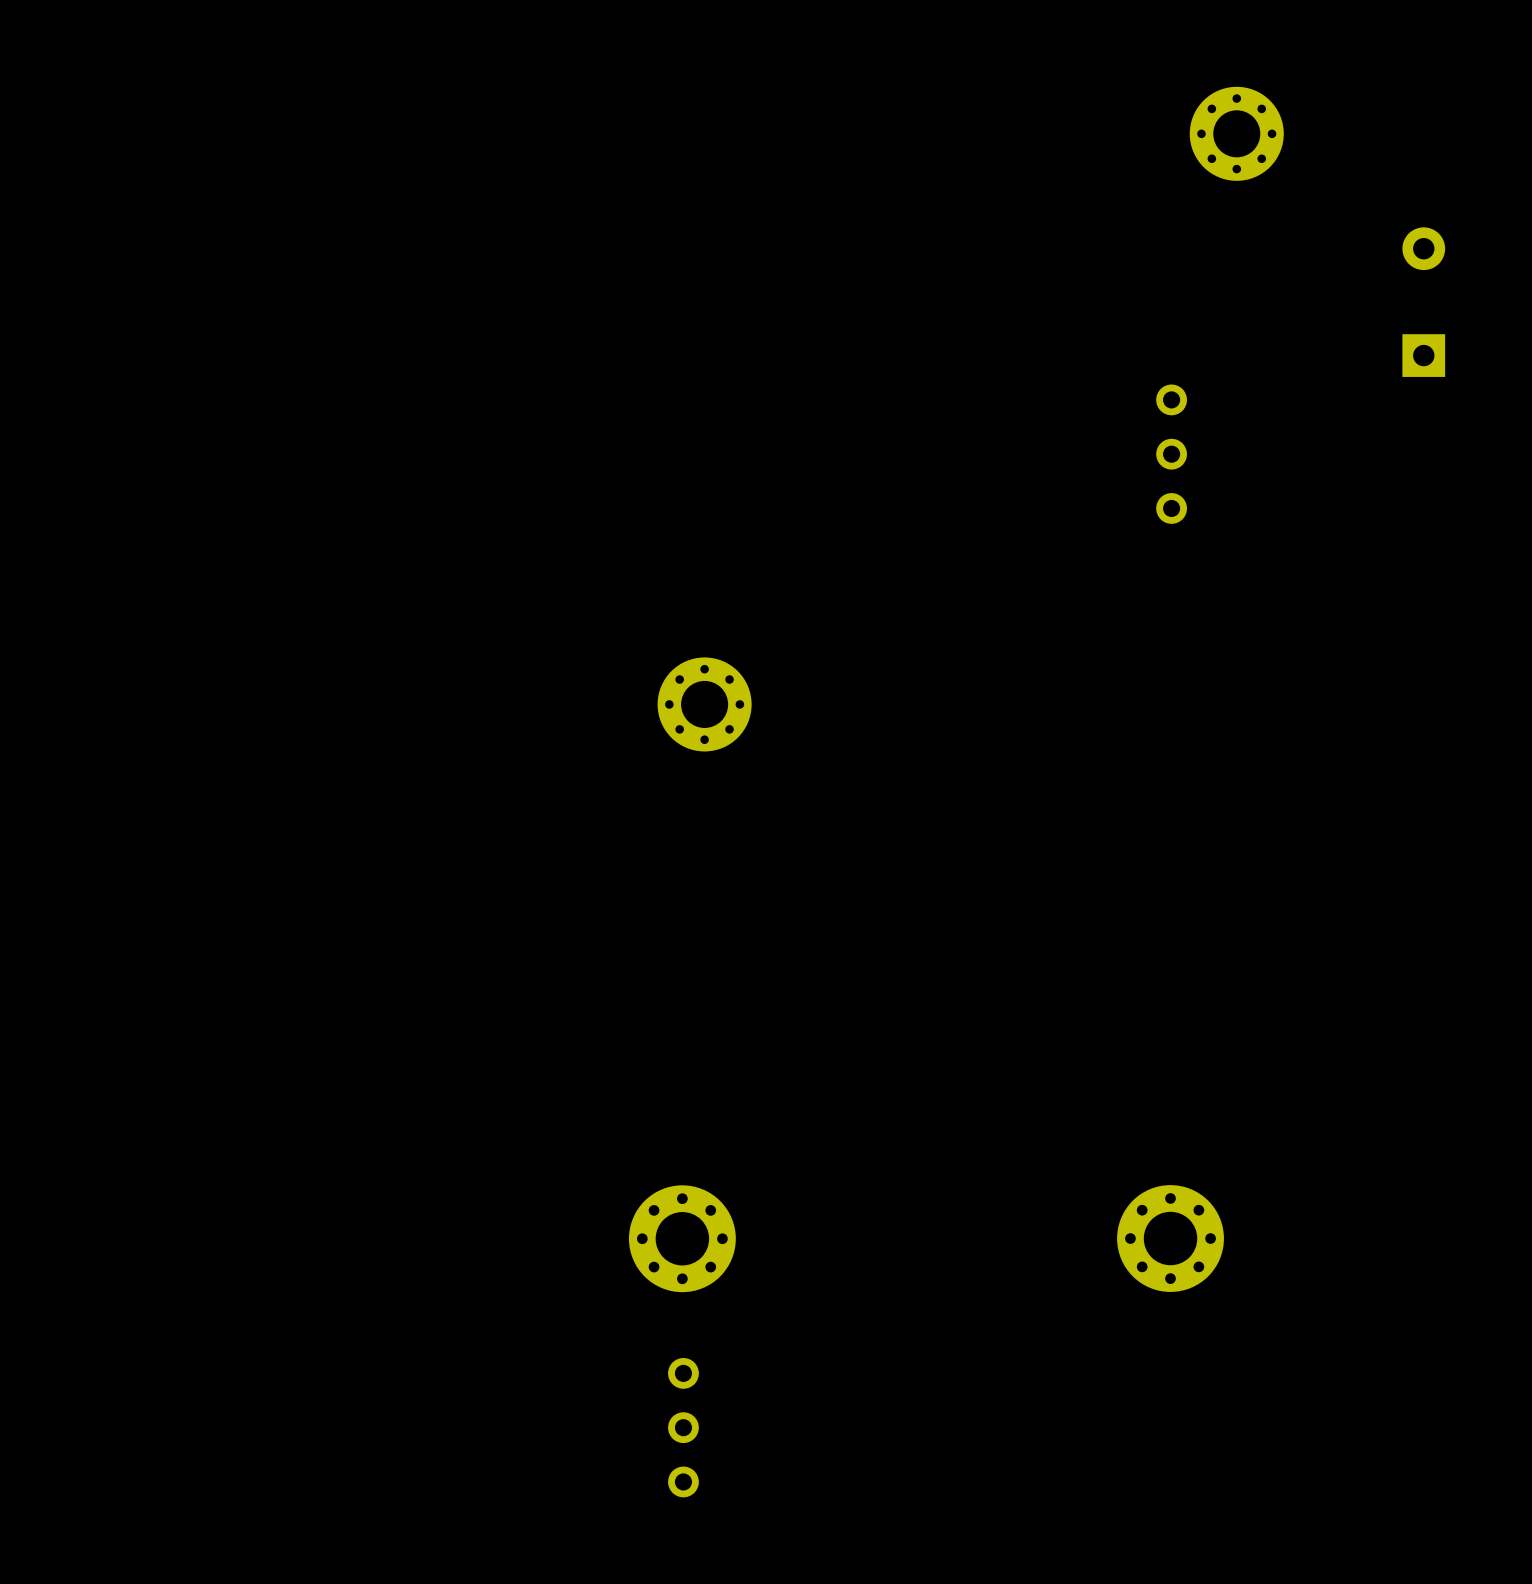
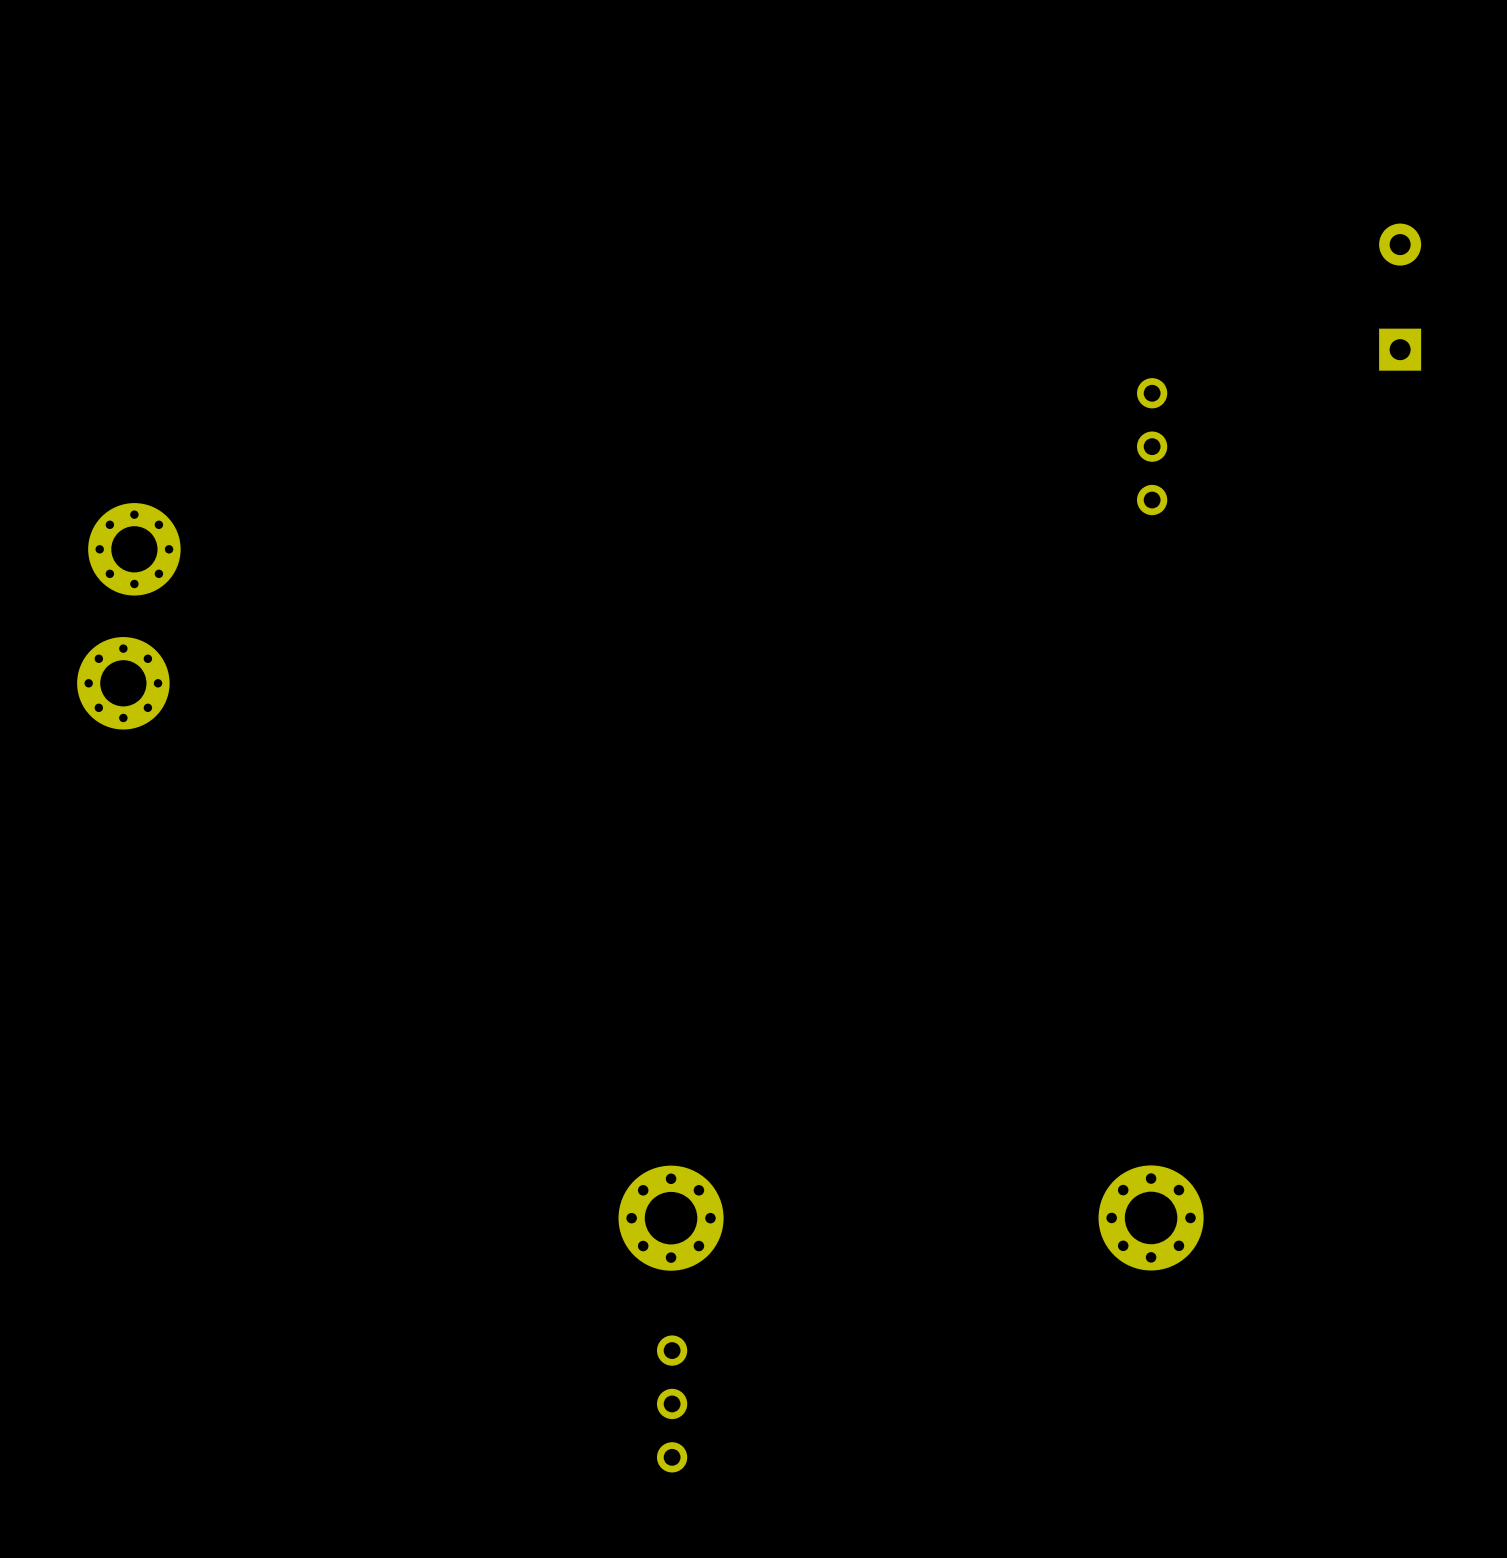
part: (1236, 133) -> none
part: none -> (134, 549)
part: none -> (123, 683)
part: (704, 704) -> none

